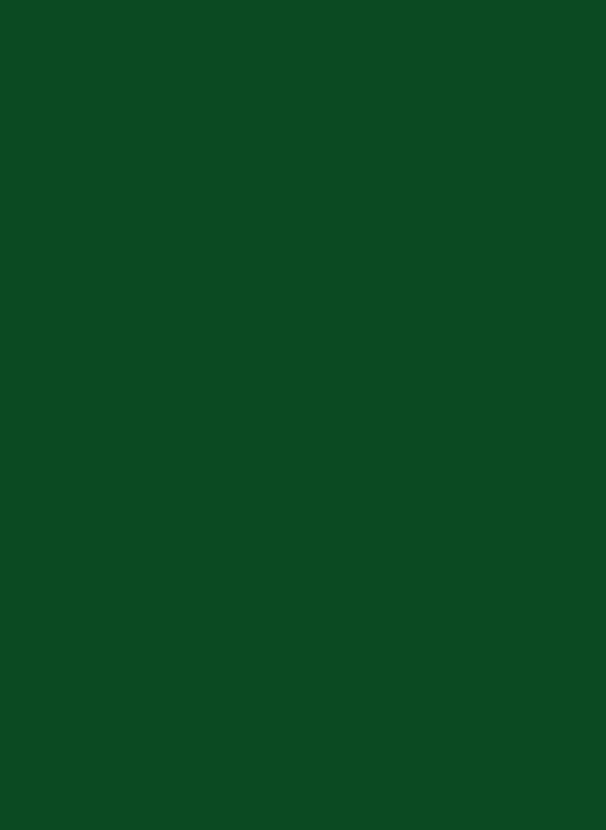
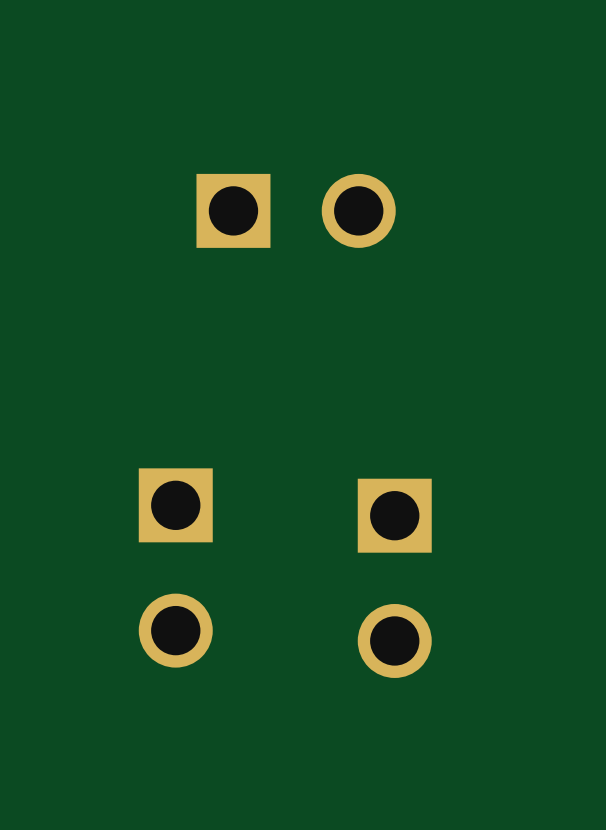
part: none -> (296, 210)
part: none -> (175, 567)
part: none -> (394, 578)

